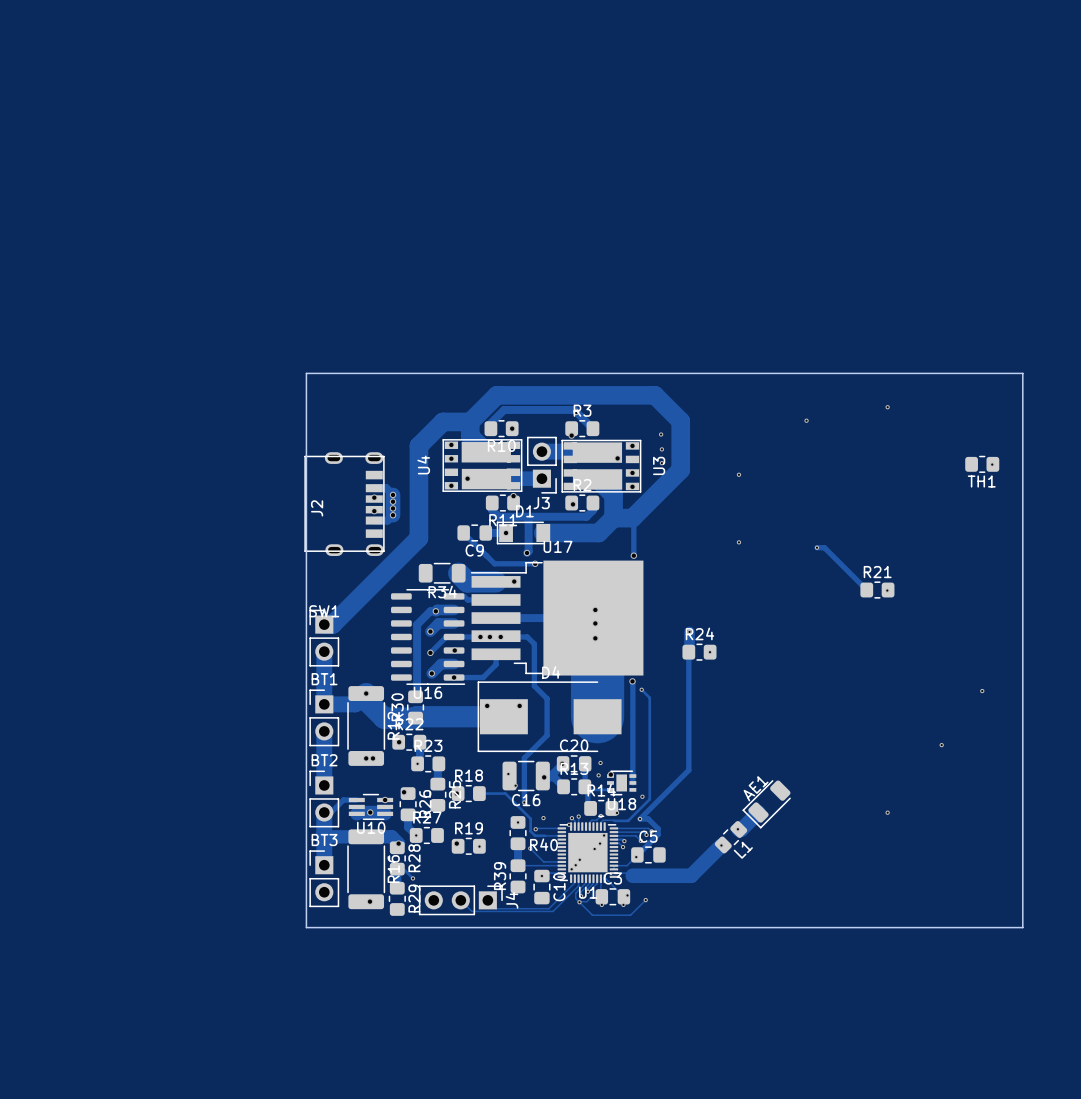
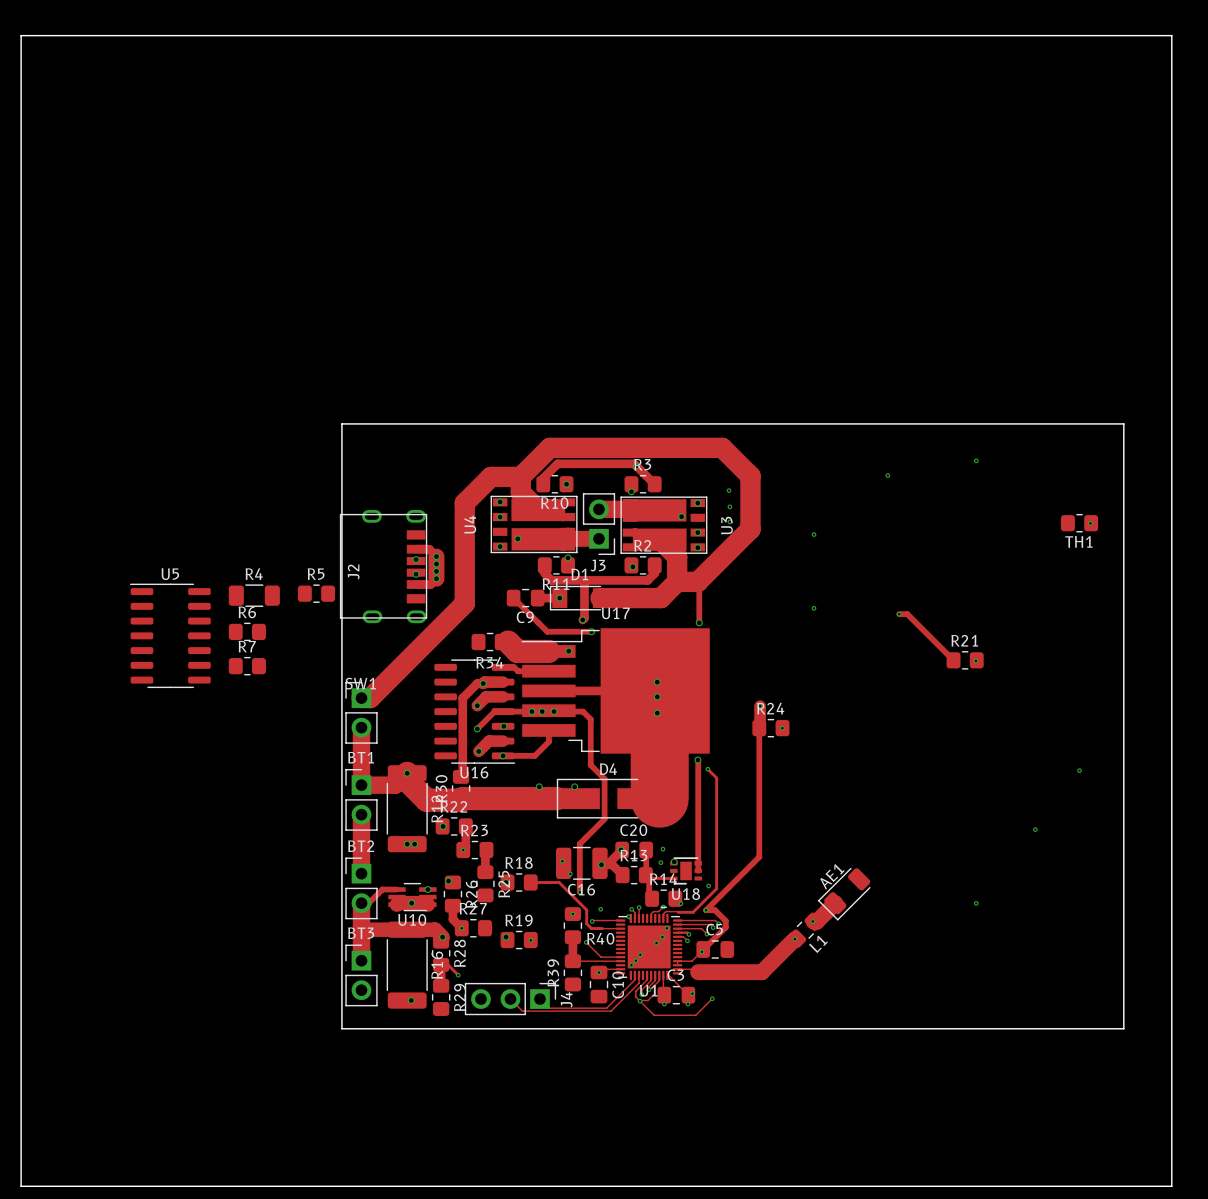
board edge: none -> (21, 35) (1171, 35) (1171, 1186) (21, 1186) (21, 35)
R5: none -> (316, 593)
R4: none -> (254, 595)
R34 footprint: [418, 562, 466, 584] -> [471, 632, 509, 652]
R6: none -> (247, 631)
U5: none -> (170, 635)
R7: none -> (247, 666)
D4 footprint: [477, 681, 622, 752] -> [556, 778, 658, 819]

